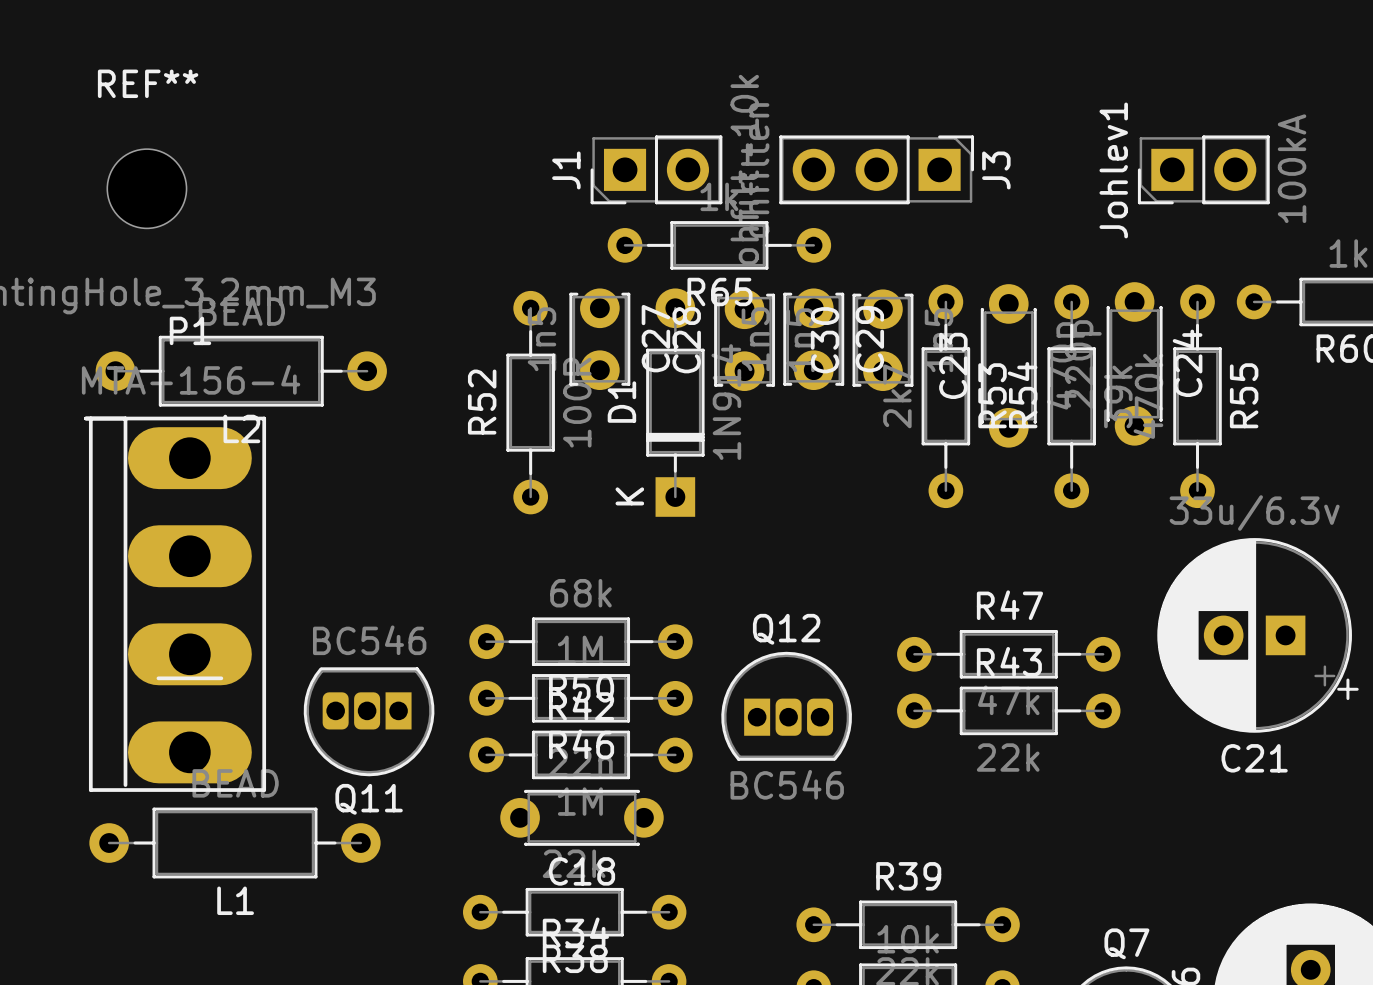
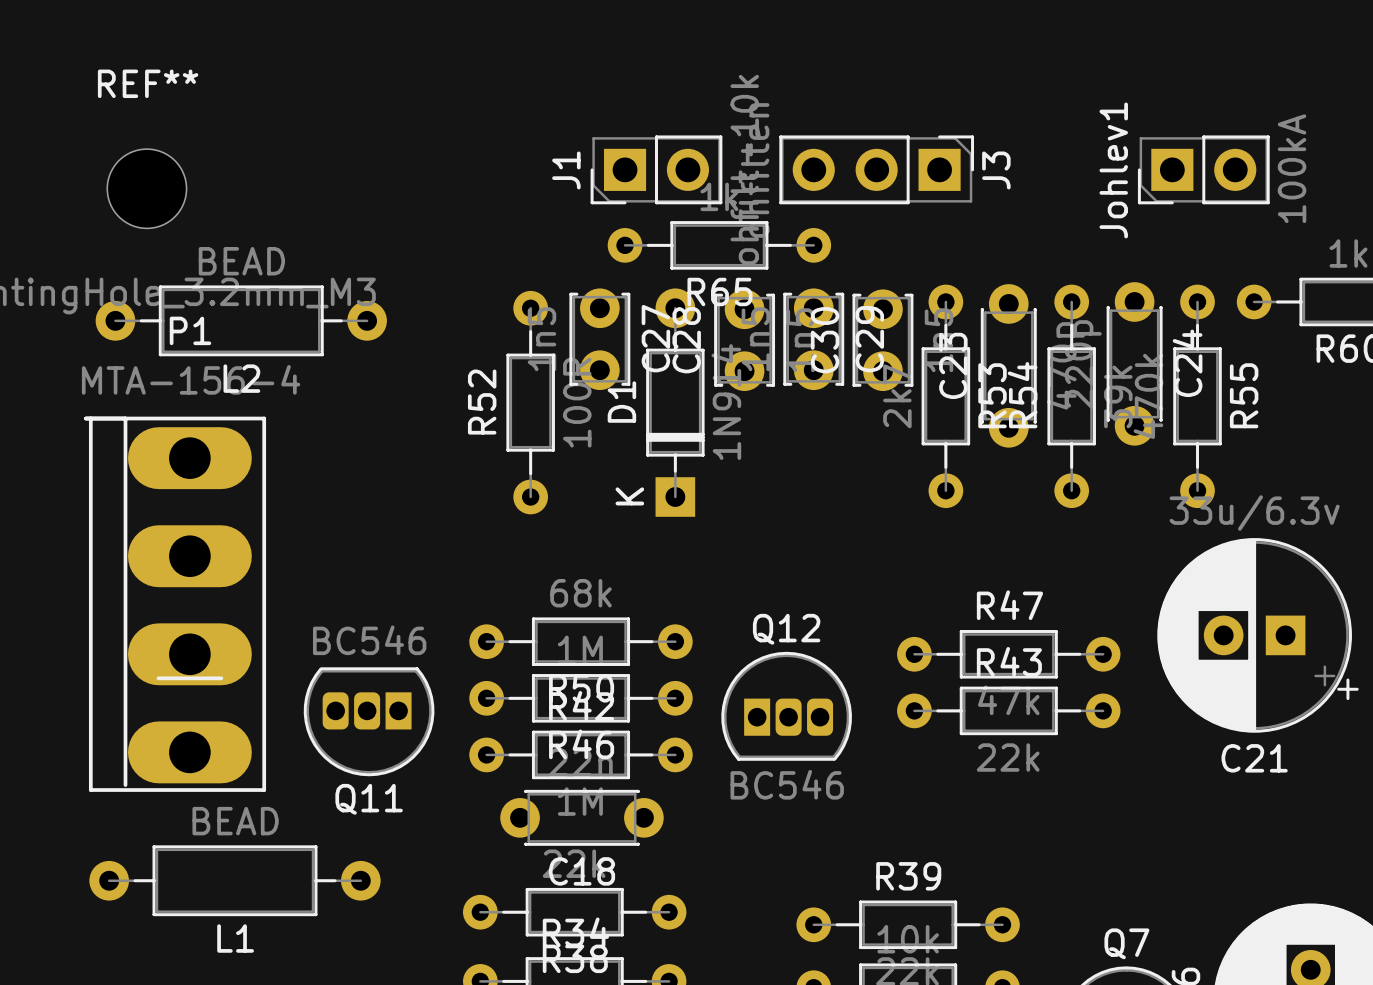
L2 position: (241, 371) -> (241, 320)
L1 position: (234, 843) -> (234, 880)

